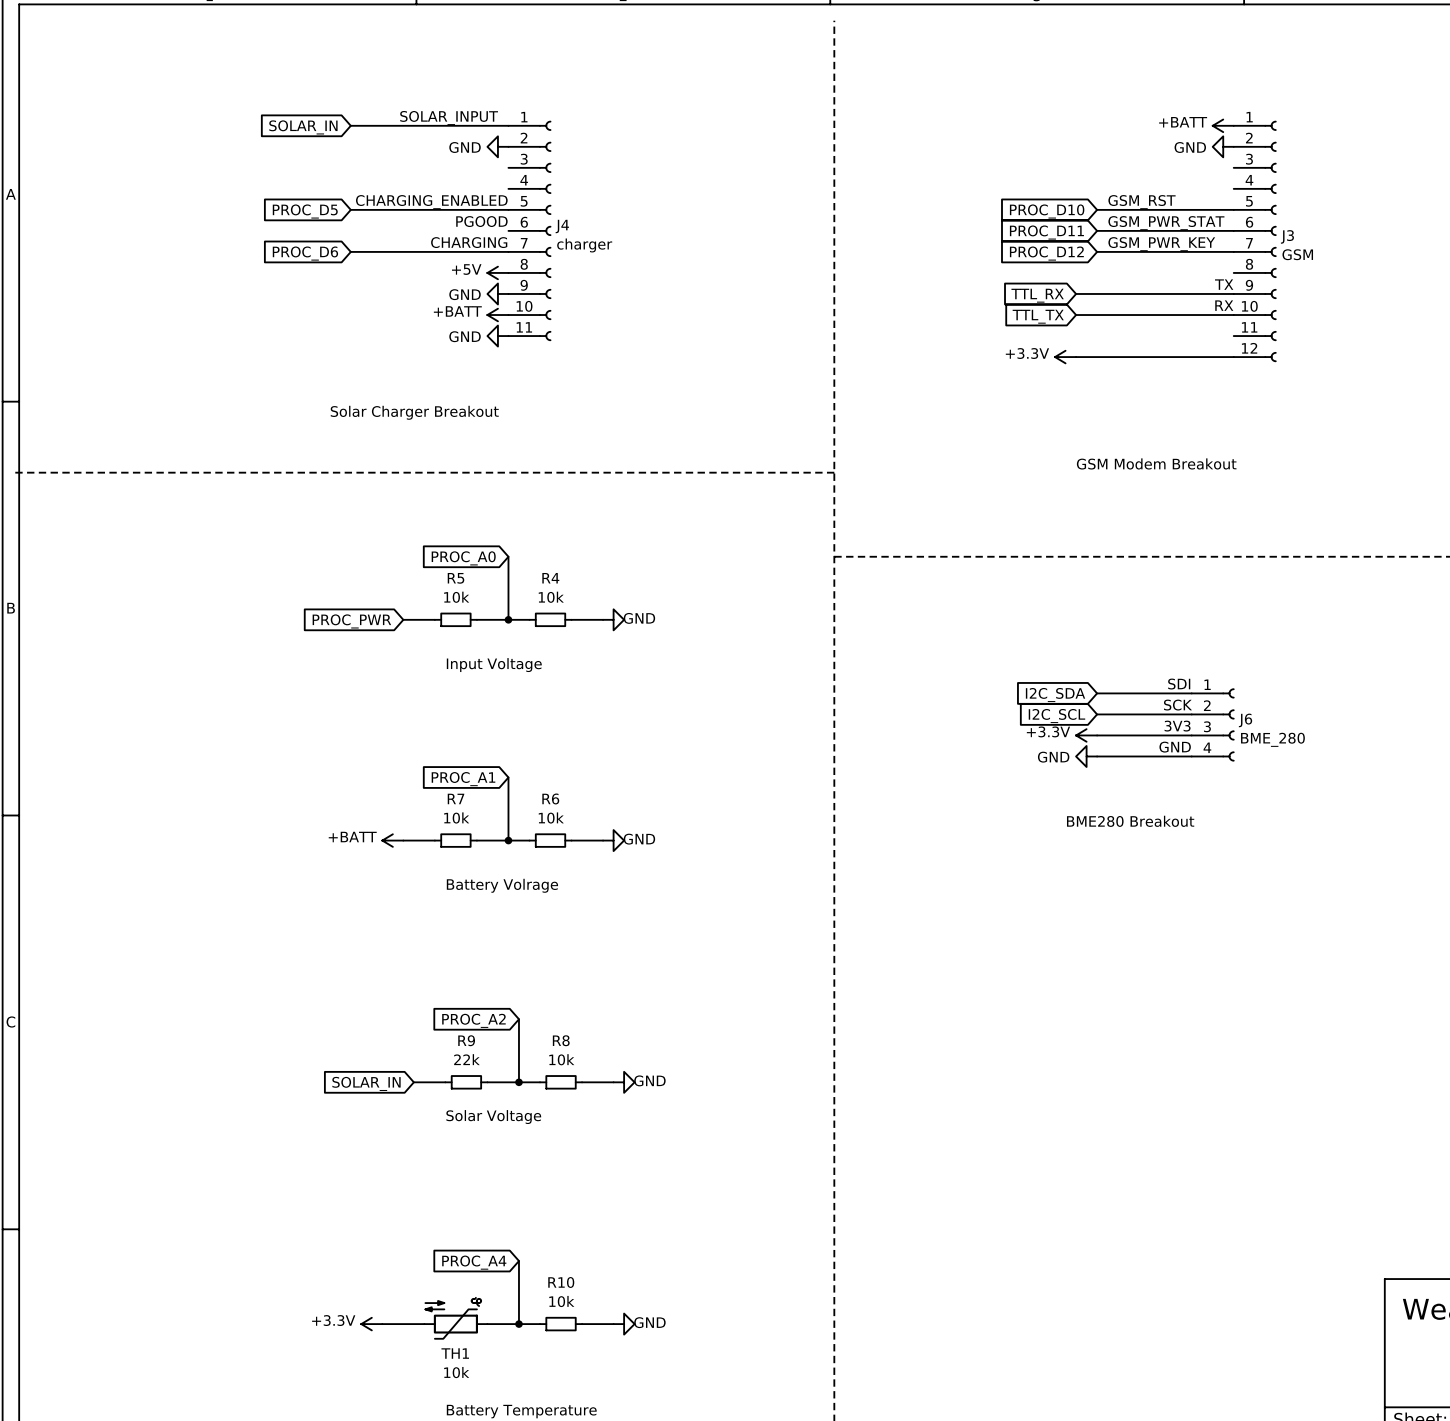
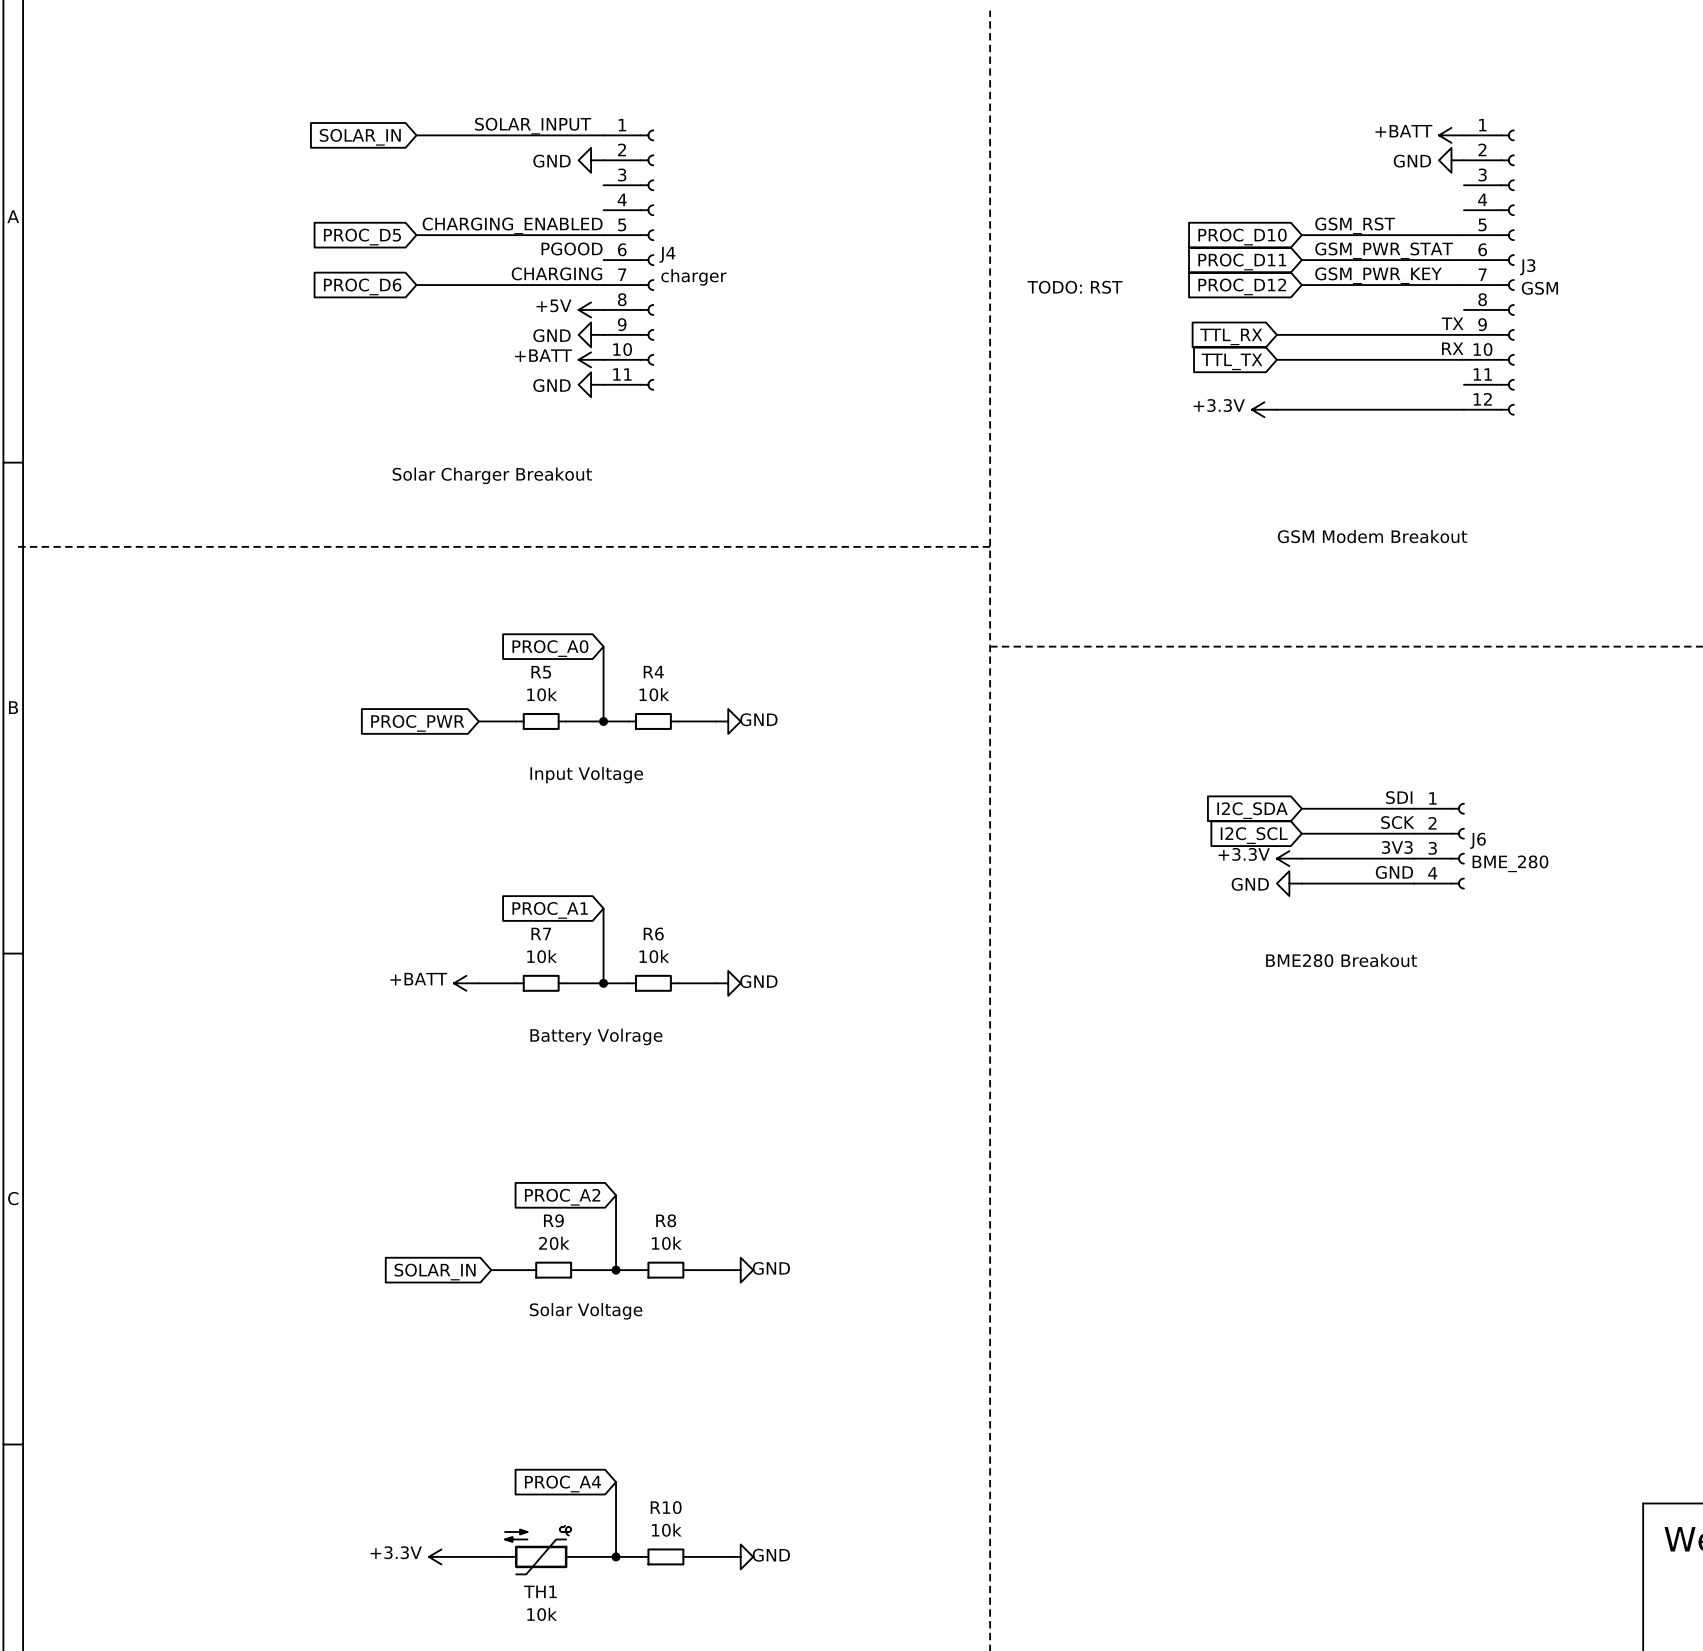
text: none -> TODO: RST (1074, 287)
R9 value: 22k (466, 1059) -> 20k (554, 1243)

